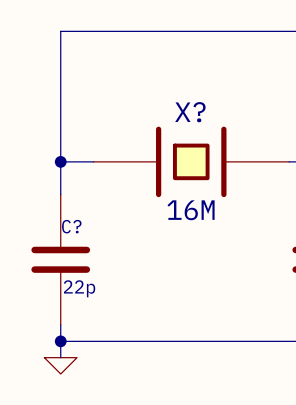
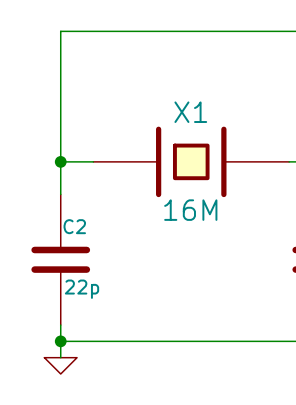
X? name: X? (190, 112) -> X1 (190, 112)
C? name: C? (71, 226) -> C2 (74, 226)

